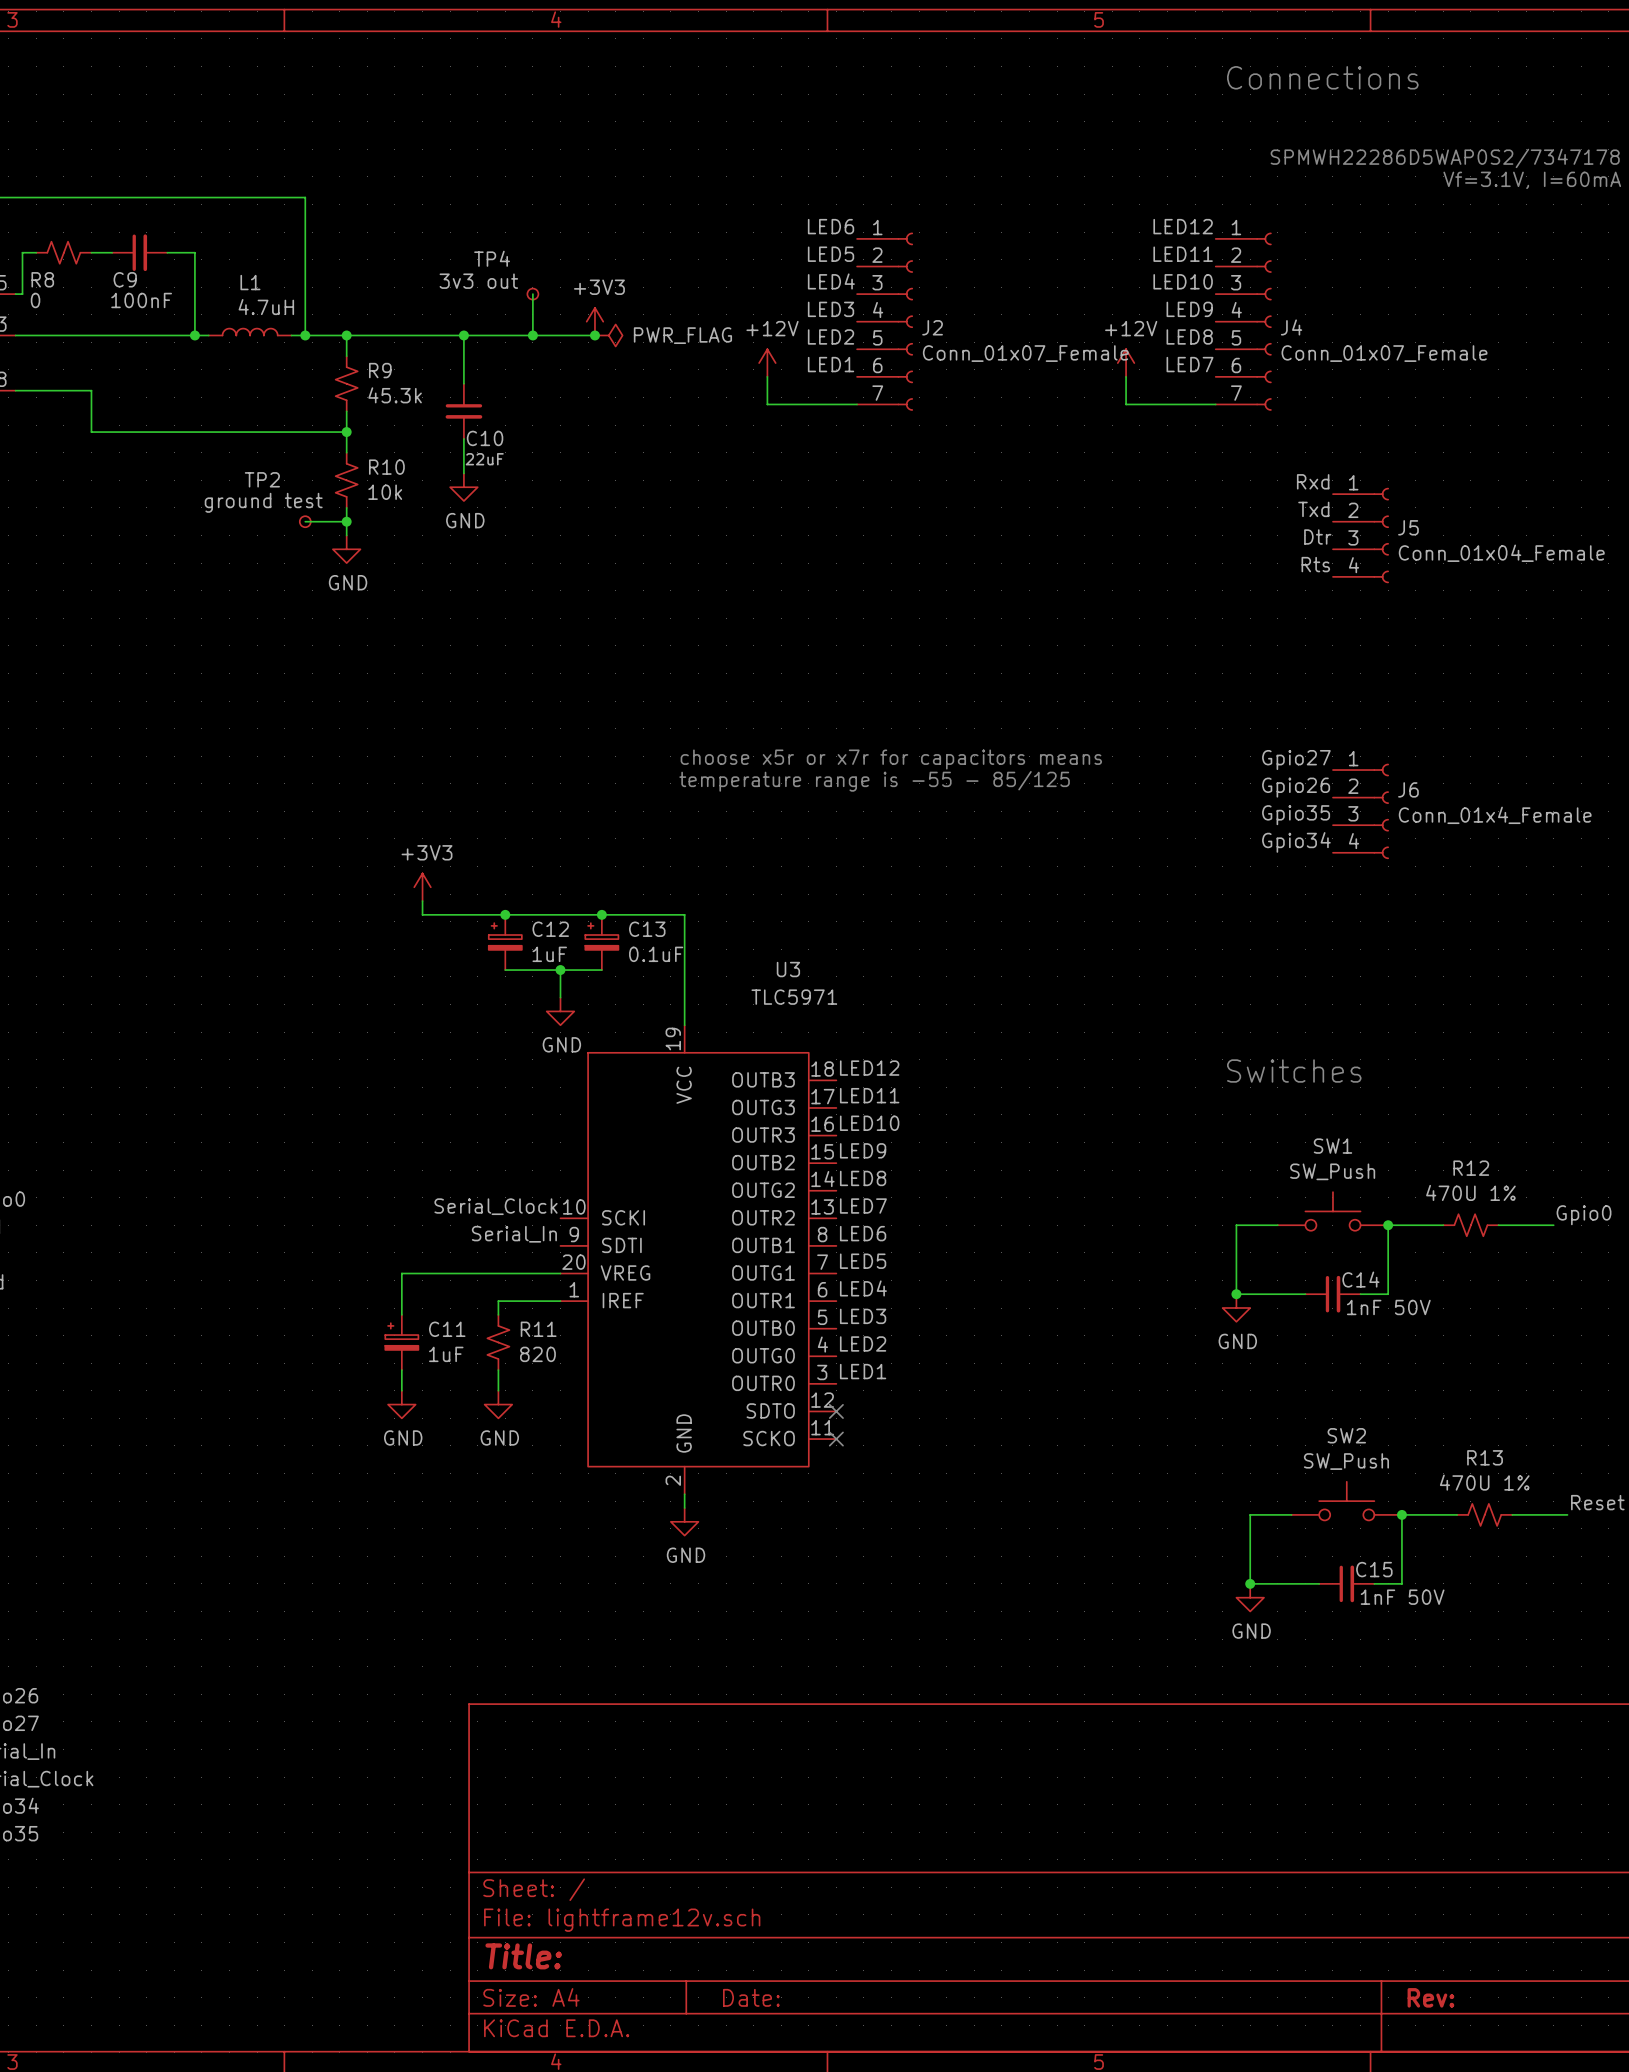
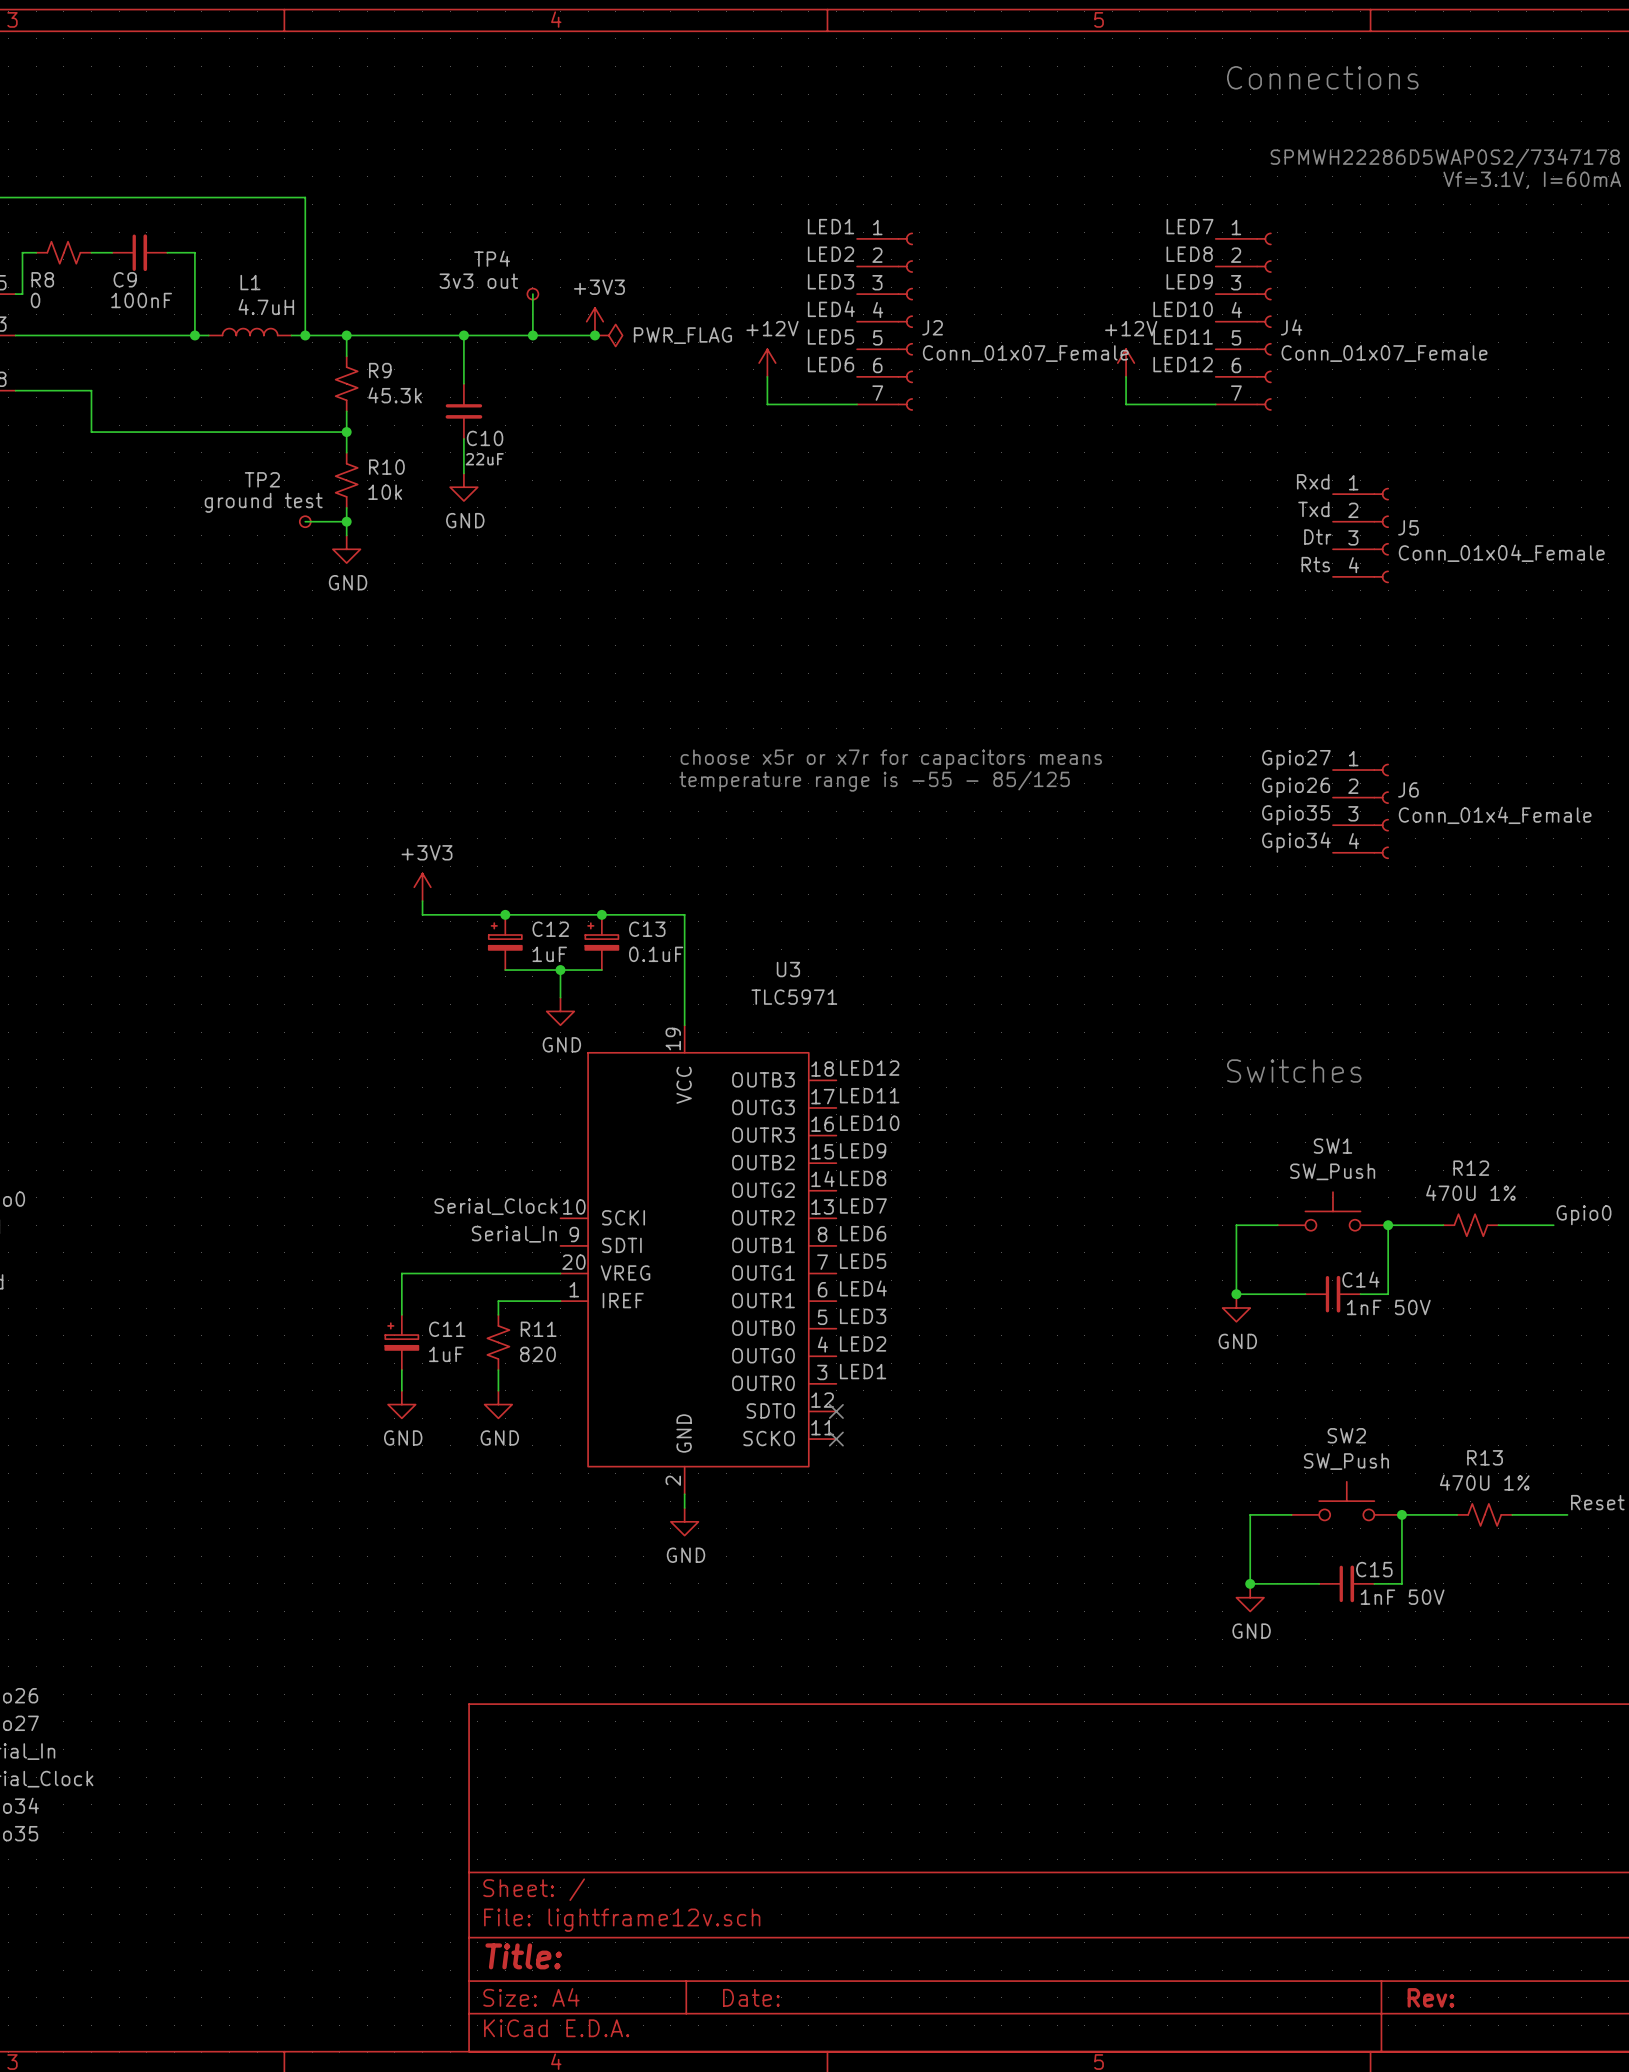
label: LED6 (831, 226) -> LED1 (831, 226)
label: LED12 (1183, 226) -> LED7 (1190, 226)
label: LED5 (831, 254) -> LED2 (831, 254)
label: LED11 (1183, 254) -> LED8 (1189, 254)
label: LED4 (831, 281) -> LED3 (831, 281)
label: LED10 (1183, 281) -> LED9 (1189, 281)
label: LED3 (831, 309) -> LED4 (831, 309)
label: LED9 (1189, 309) -> LED10 (1183, 309)
label: LED2 (831, 336) -> LED5 (831, 336)
label: LED8 (1189, 336) -> LED11 (1183, 336)
label: LED1 (831, 364) -> LED6 (831, 364)
label: LED7 (1190, 364) -> LED12 (1183, 364)

